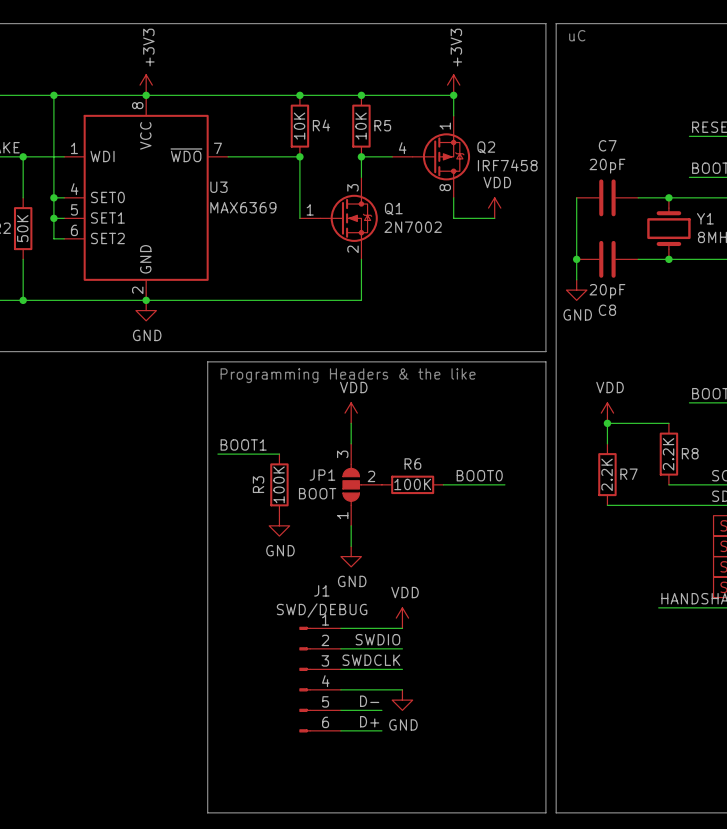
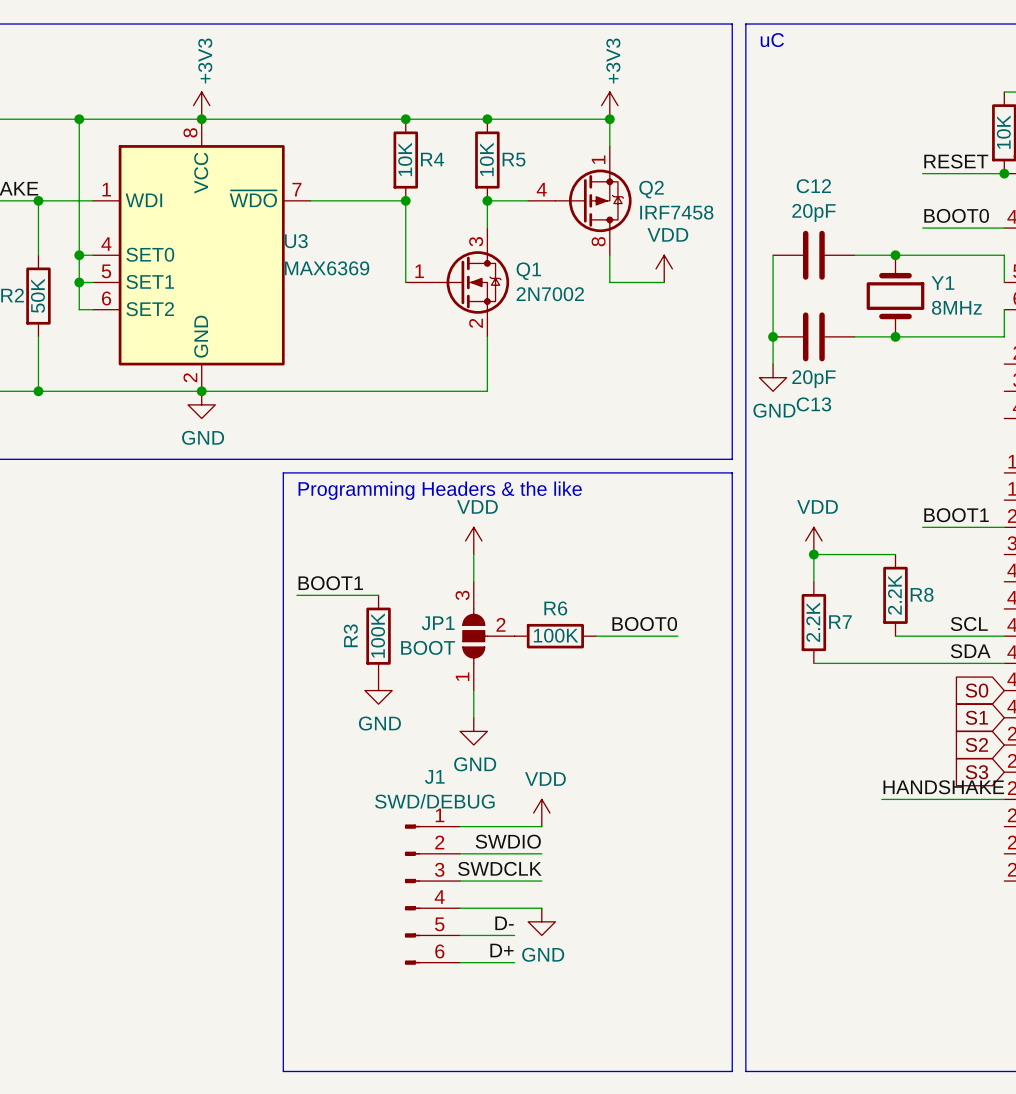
C7 name: C7 (607, 145) -> C12 (813, 186)
C8 name: C8 (607, 310) -> C13 (813, 404)

